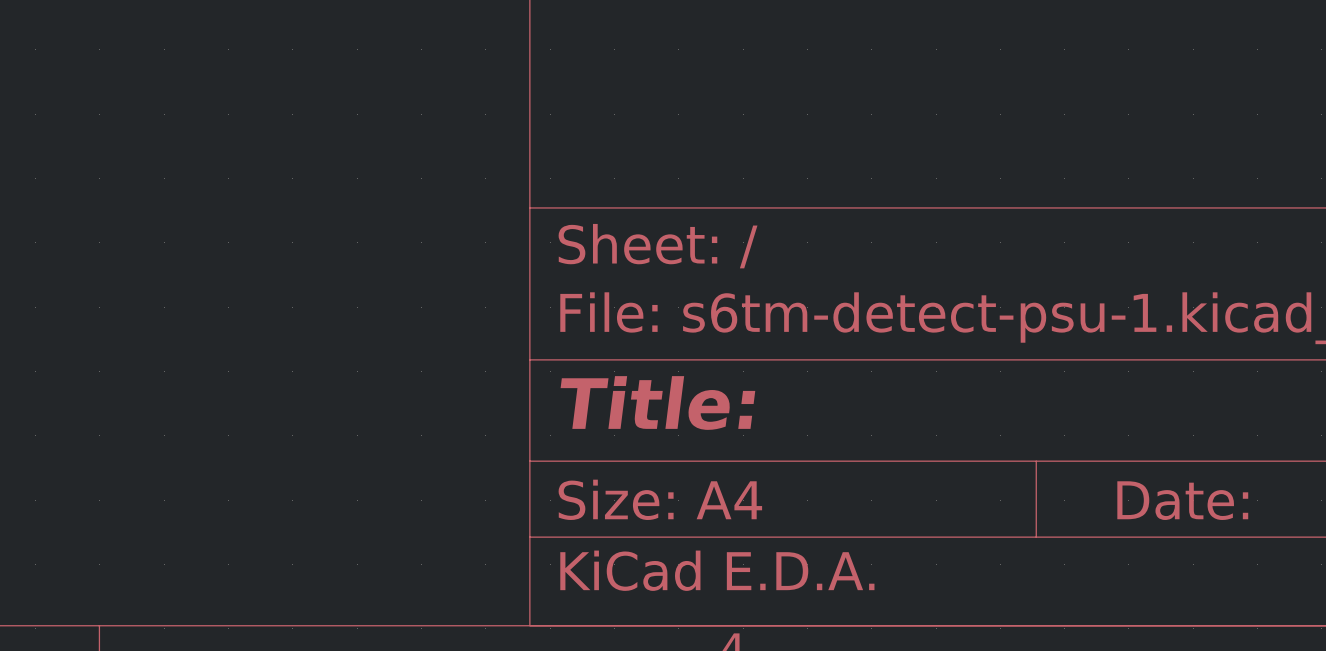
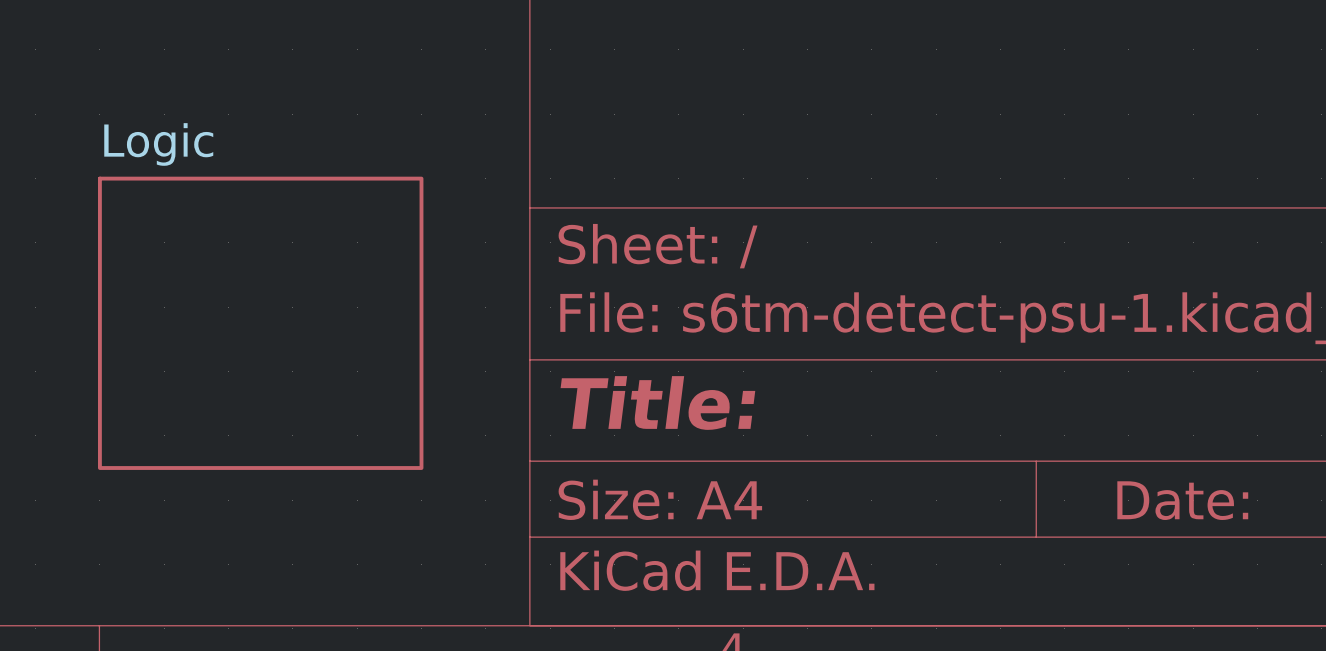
sheet Logic: none -> (260, 323)

